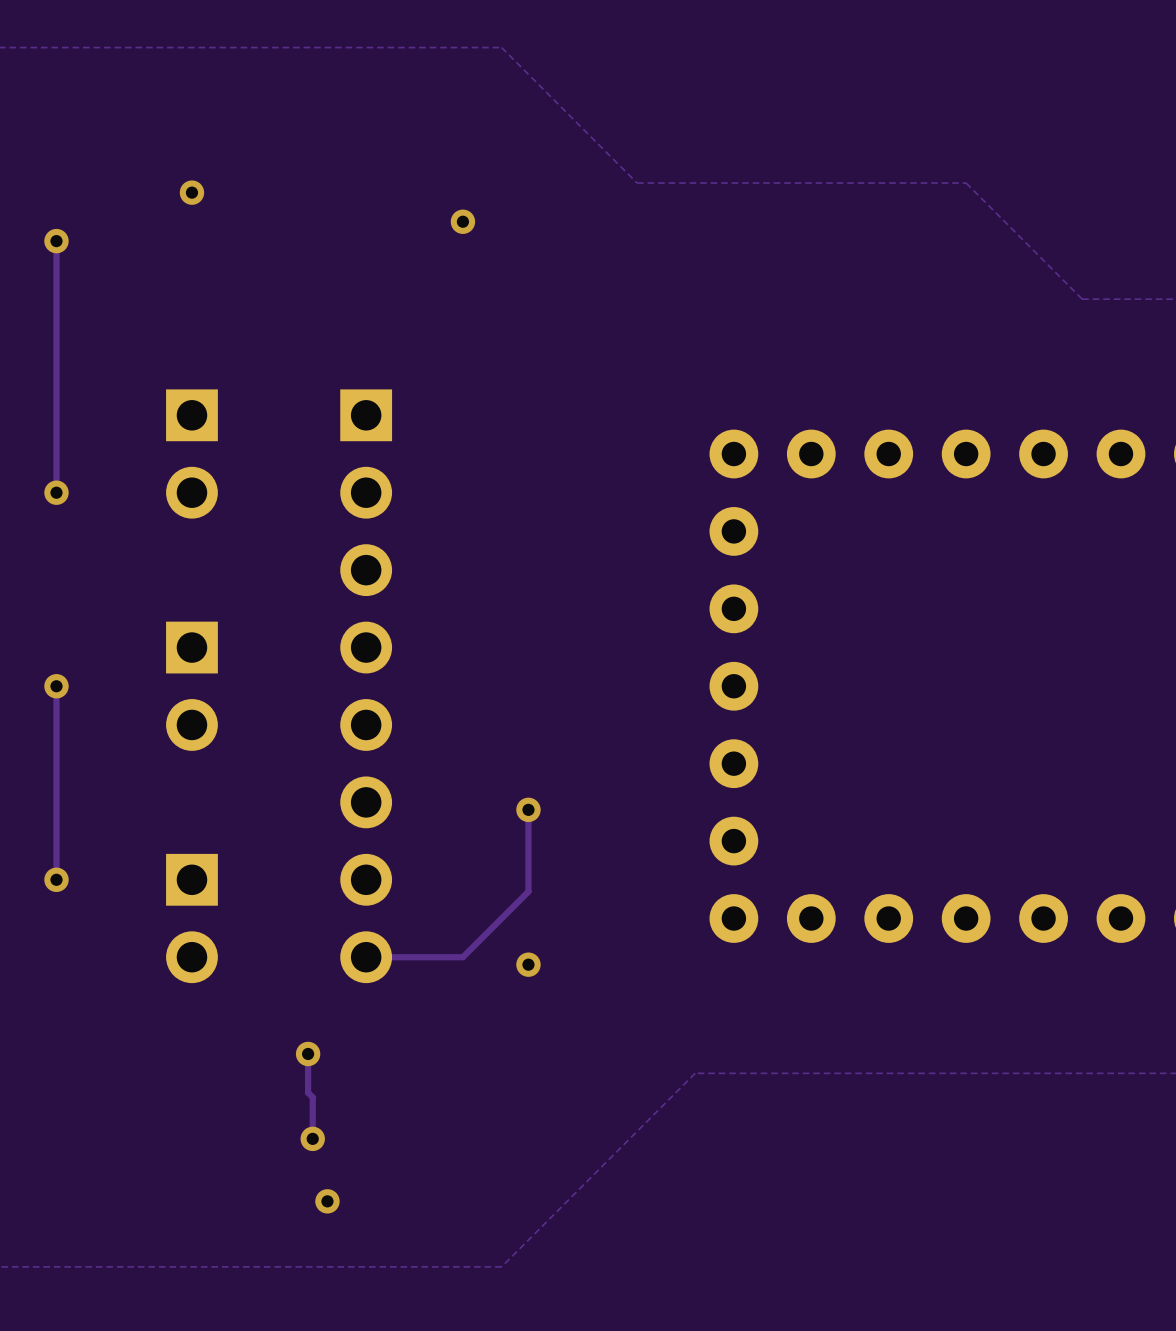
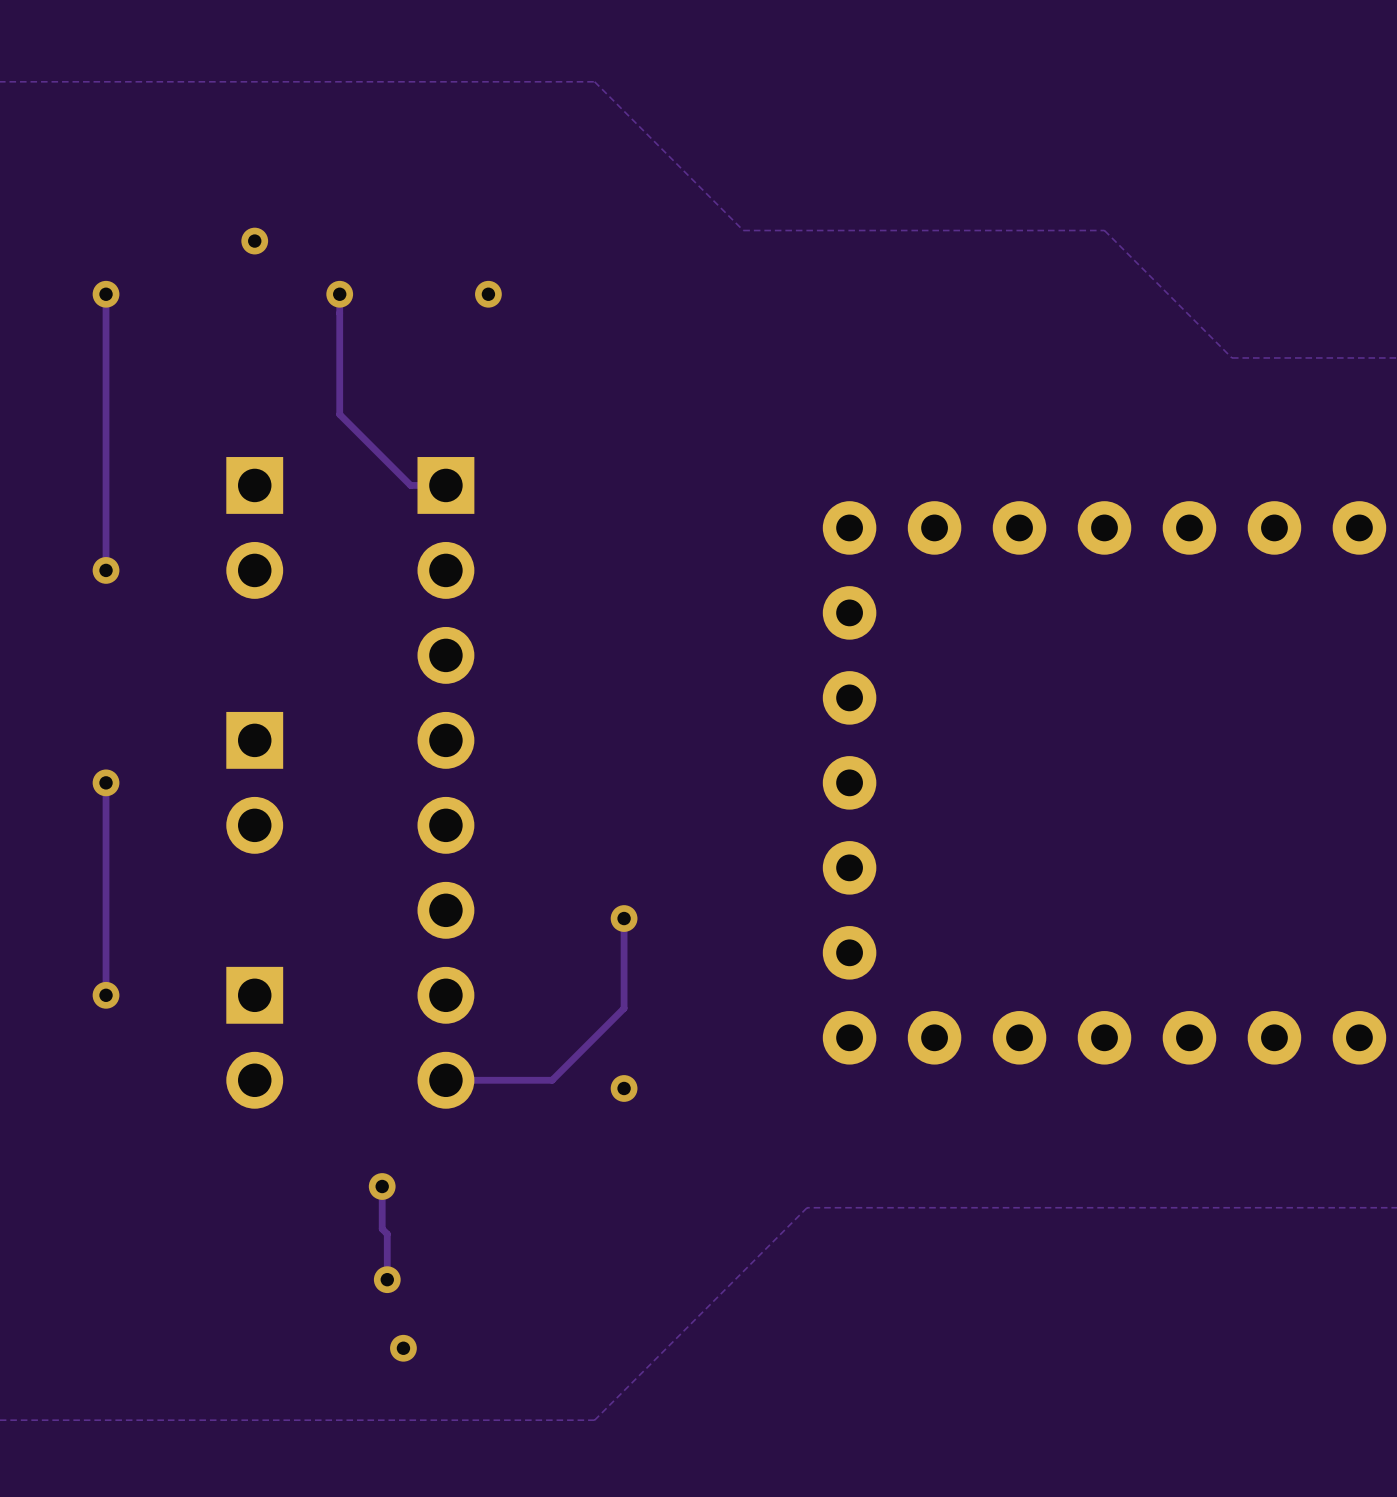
via position: (462, 221) -> (488, 294)
track: none -> (339, 294) (339, 414) (410, 485) (445, 485)
via: none -> (339, 294)

